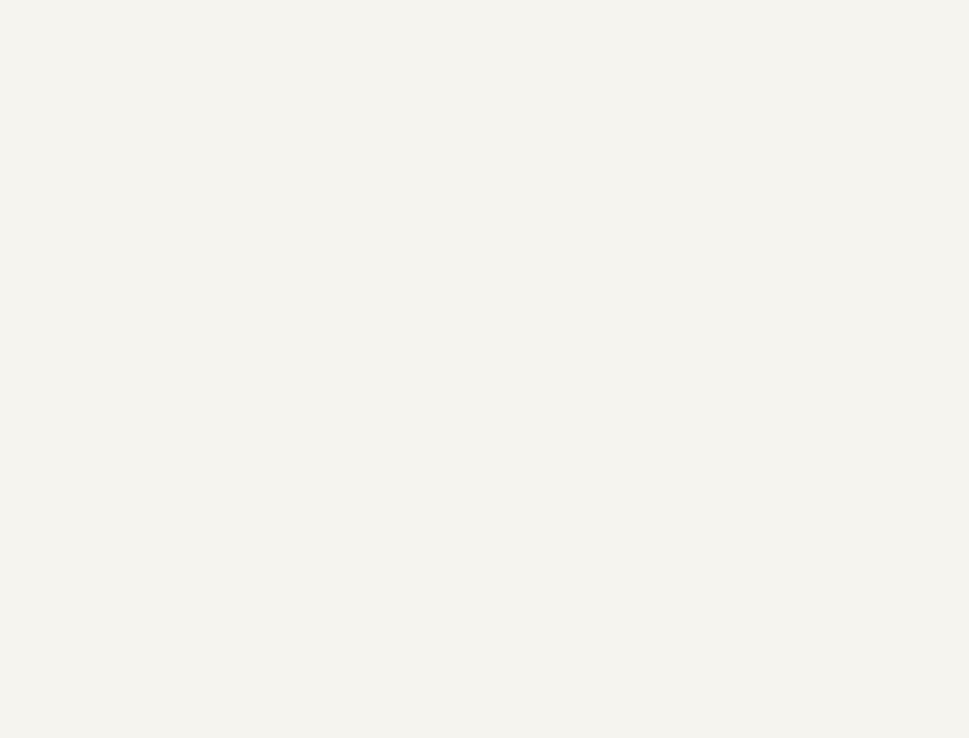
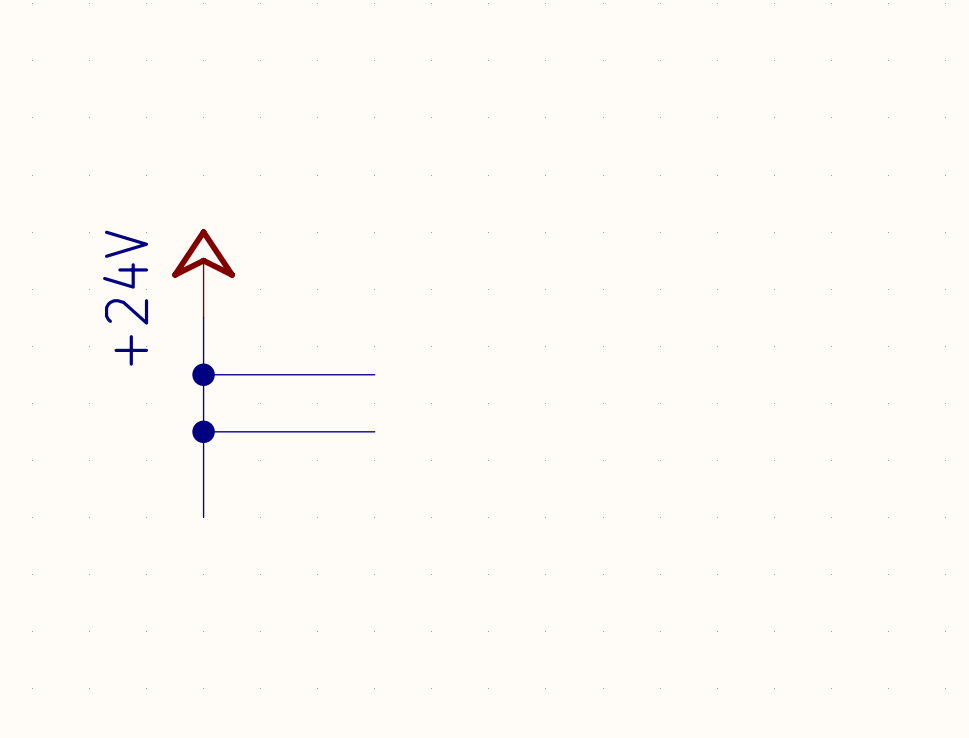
power symbol: none -> +24V (203, 273)
wire: none -> (203, 317) (203, 517)
wire: none -> (203, 374) (374, 374)
junction: none -> (203, 374)
wire: none -> (203, 431) (374, 431)
junction: none -> (203, 431)

